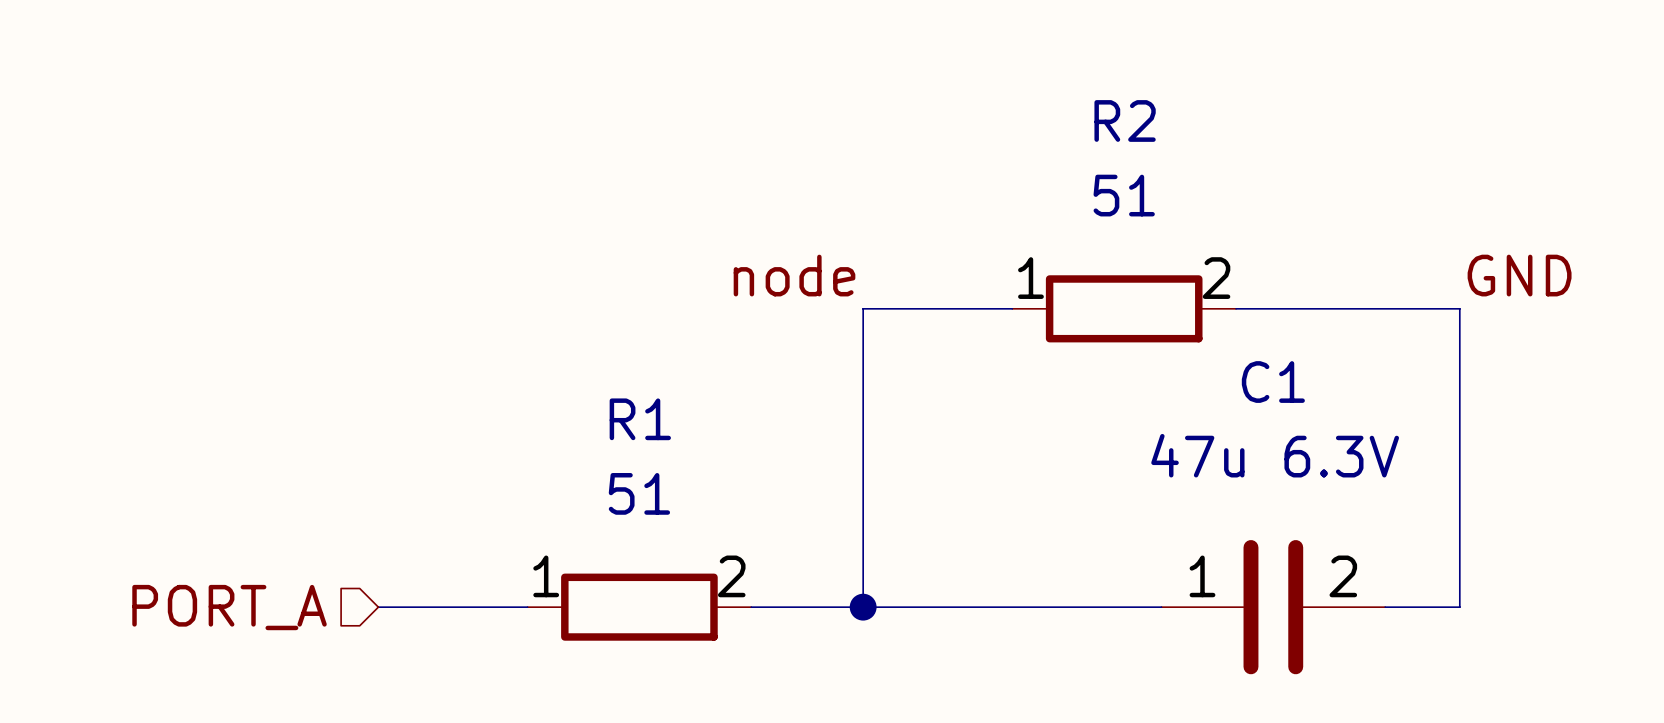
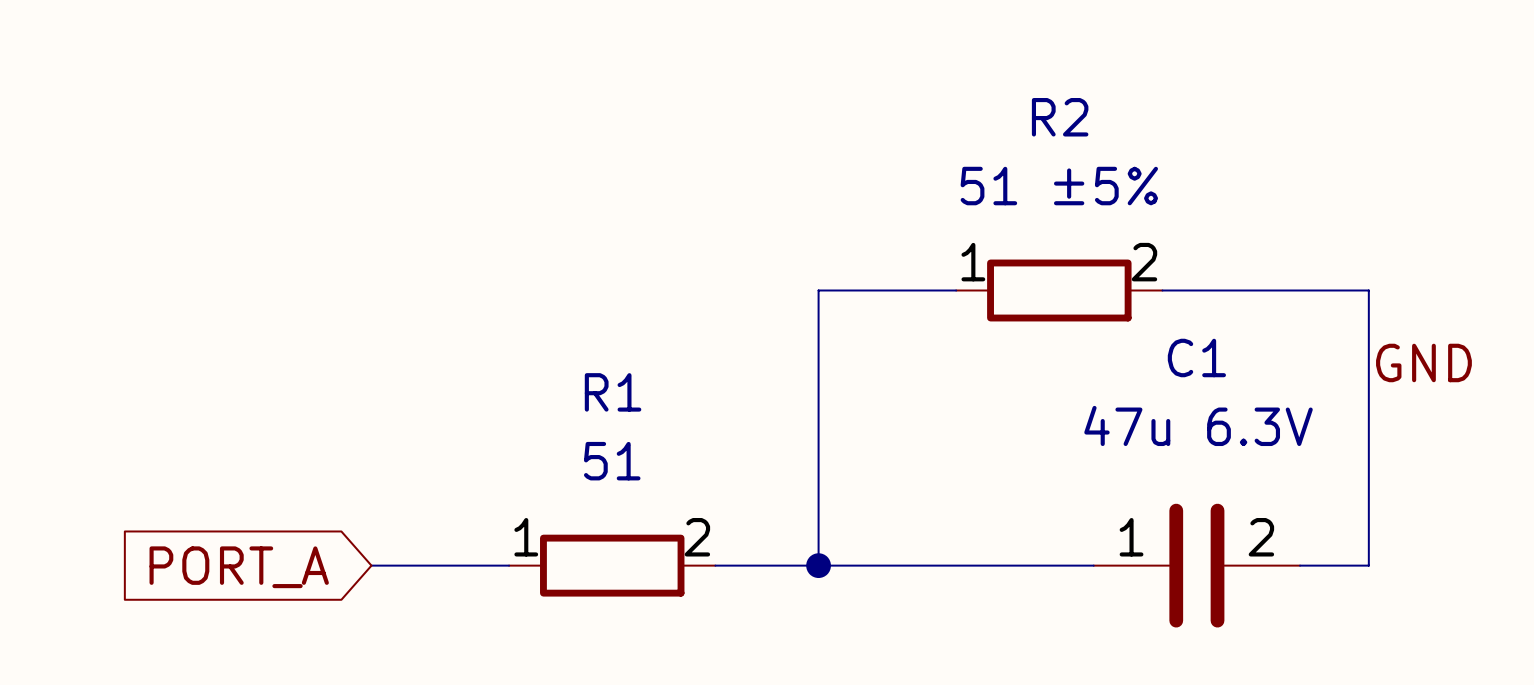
R2 value: 51 (1124, 195) -> 51 ±5% (1059, 186)
label: node (794, 275) -> none
label position: GND (1519, 275) -> GND (1423, 362)
hierarchical label: PORT_A (229, 607) -> none
global label: none -> PORT_A (239, 567)

